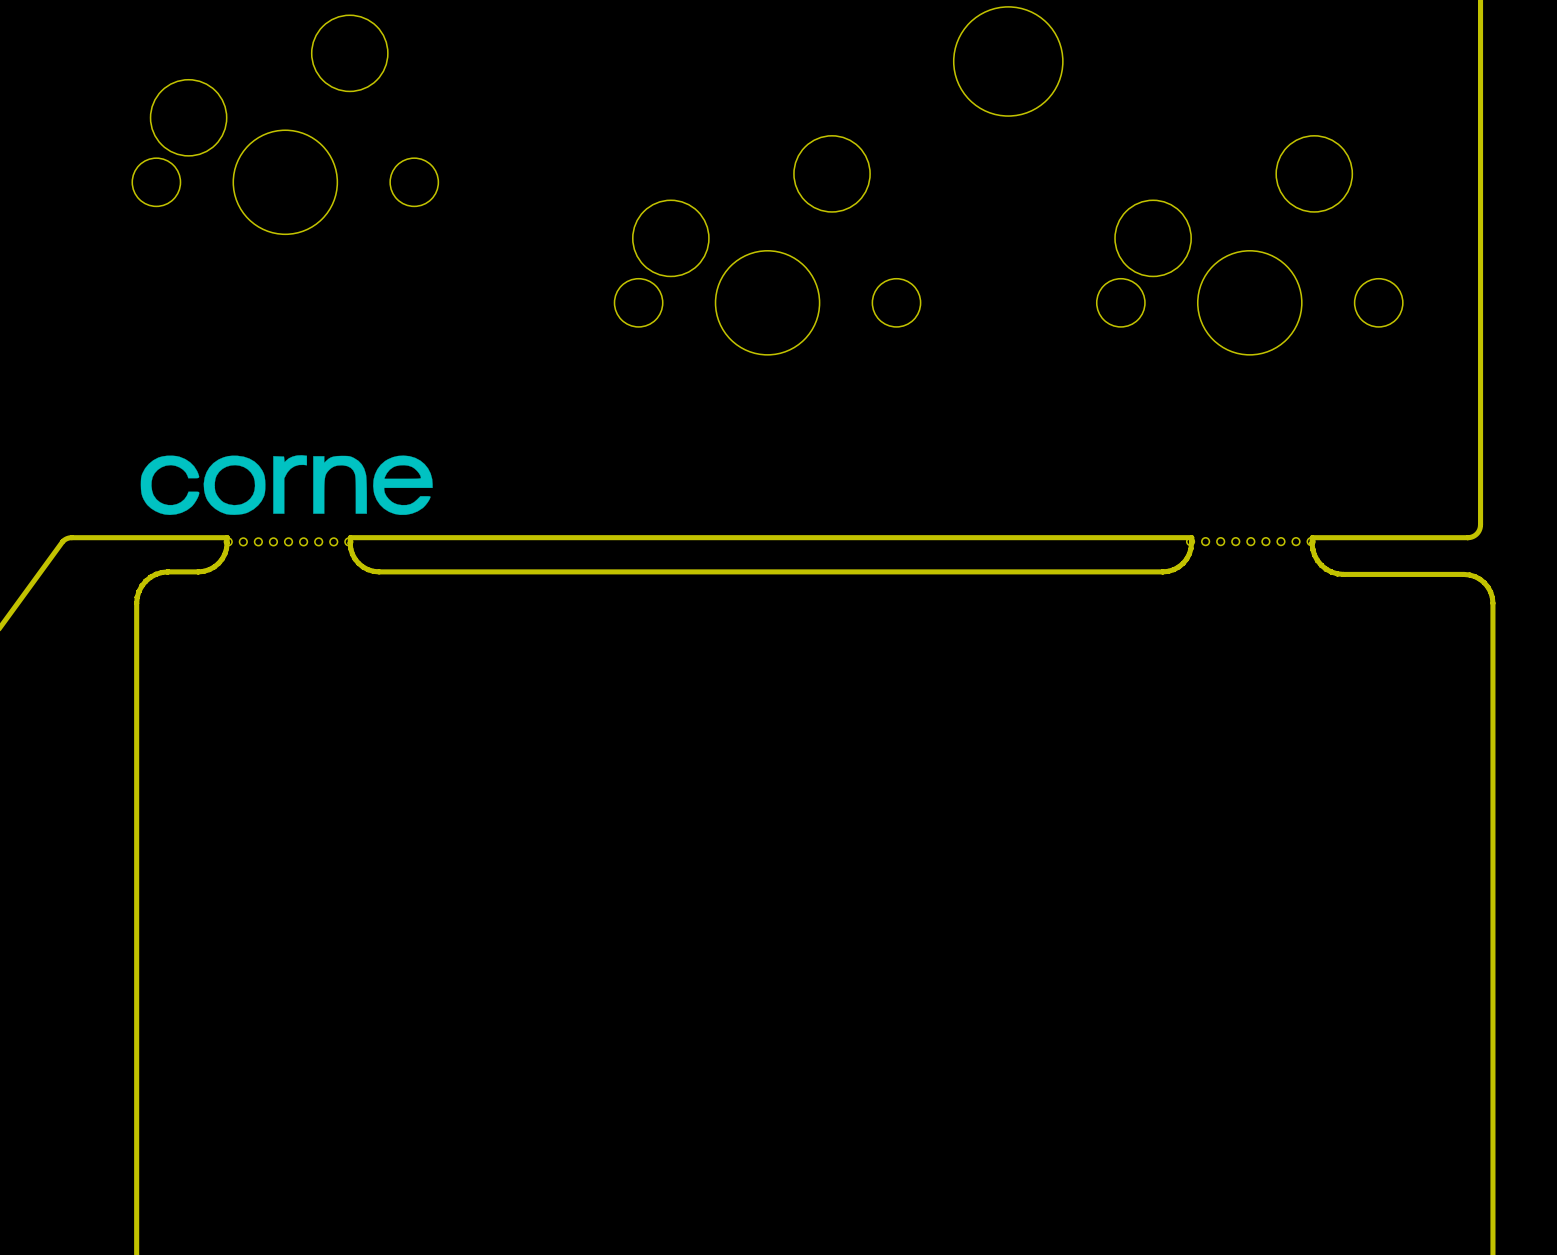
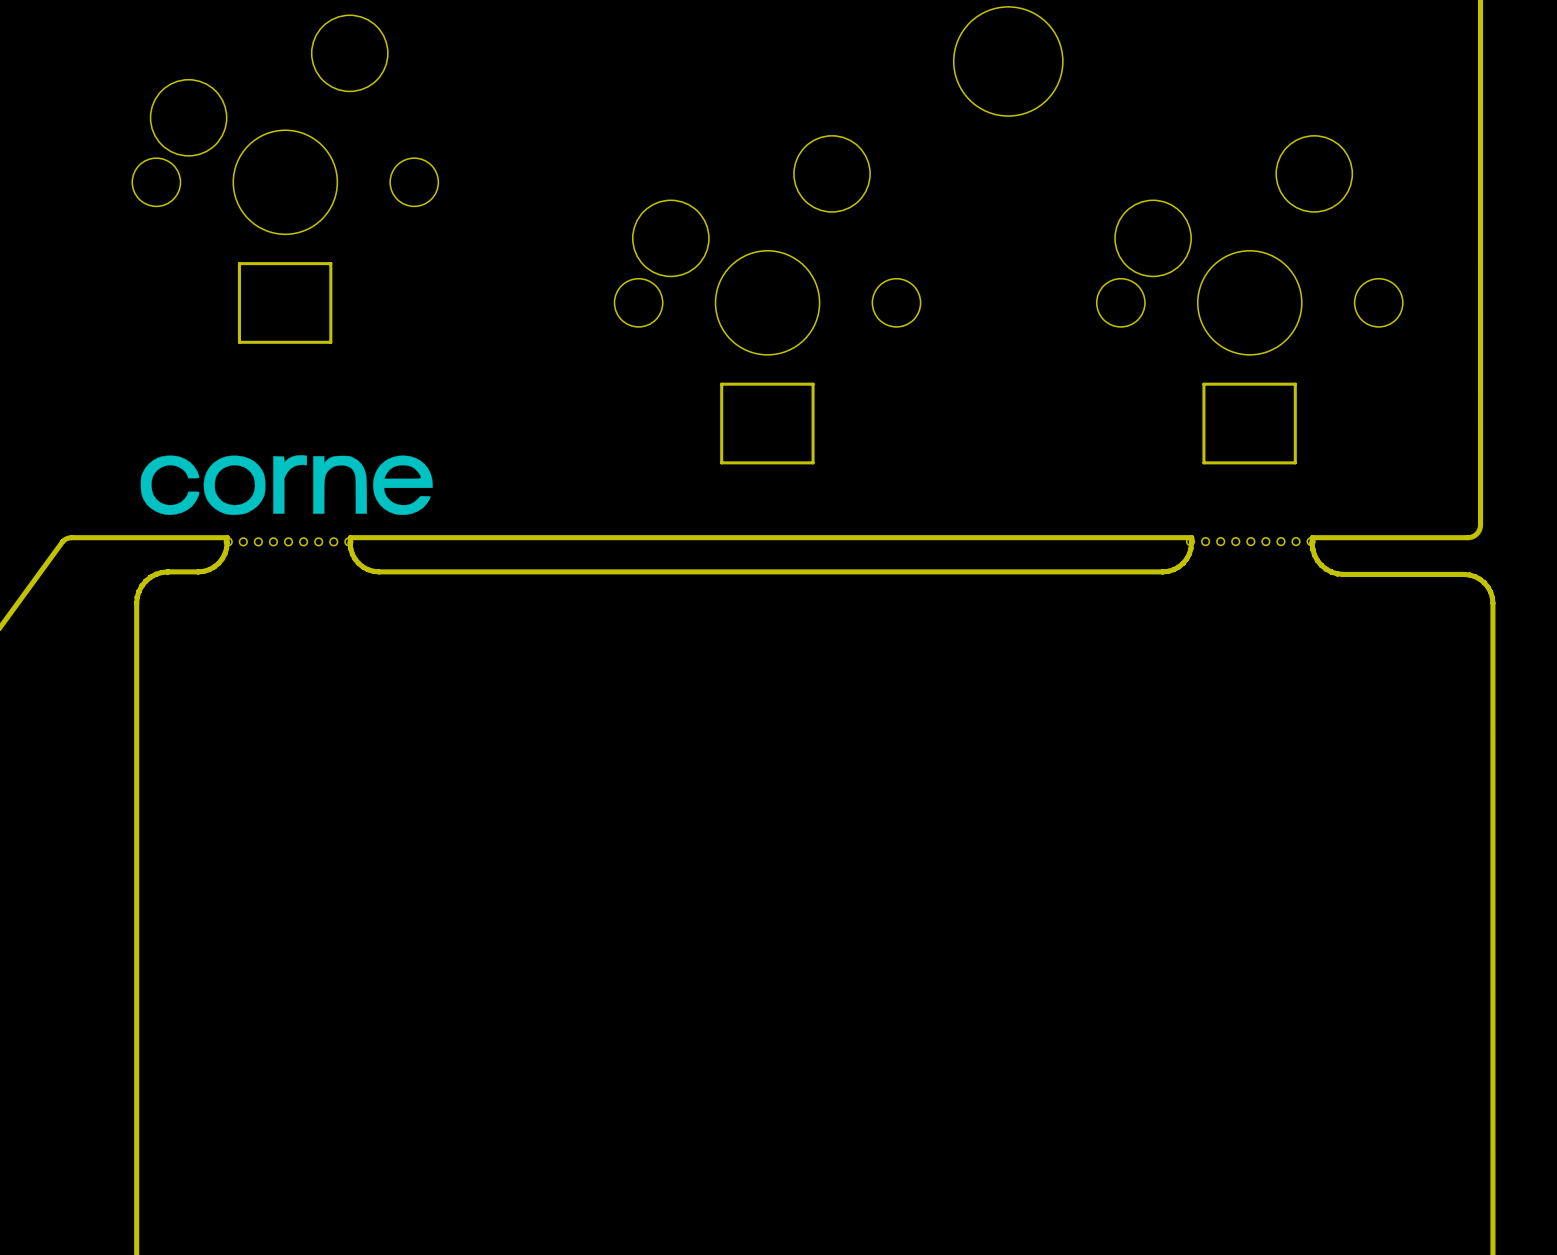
part: none -> (285, 302)
part: none -> (767, 423)
part: none -> (1249, 423)

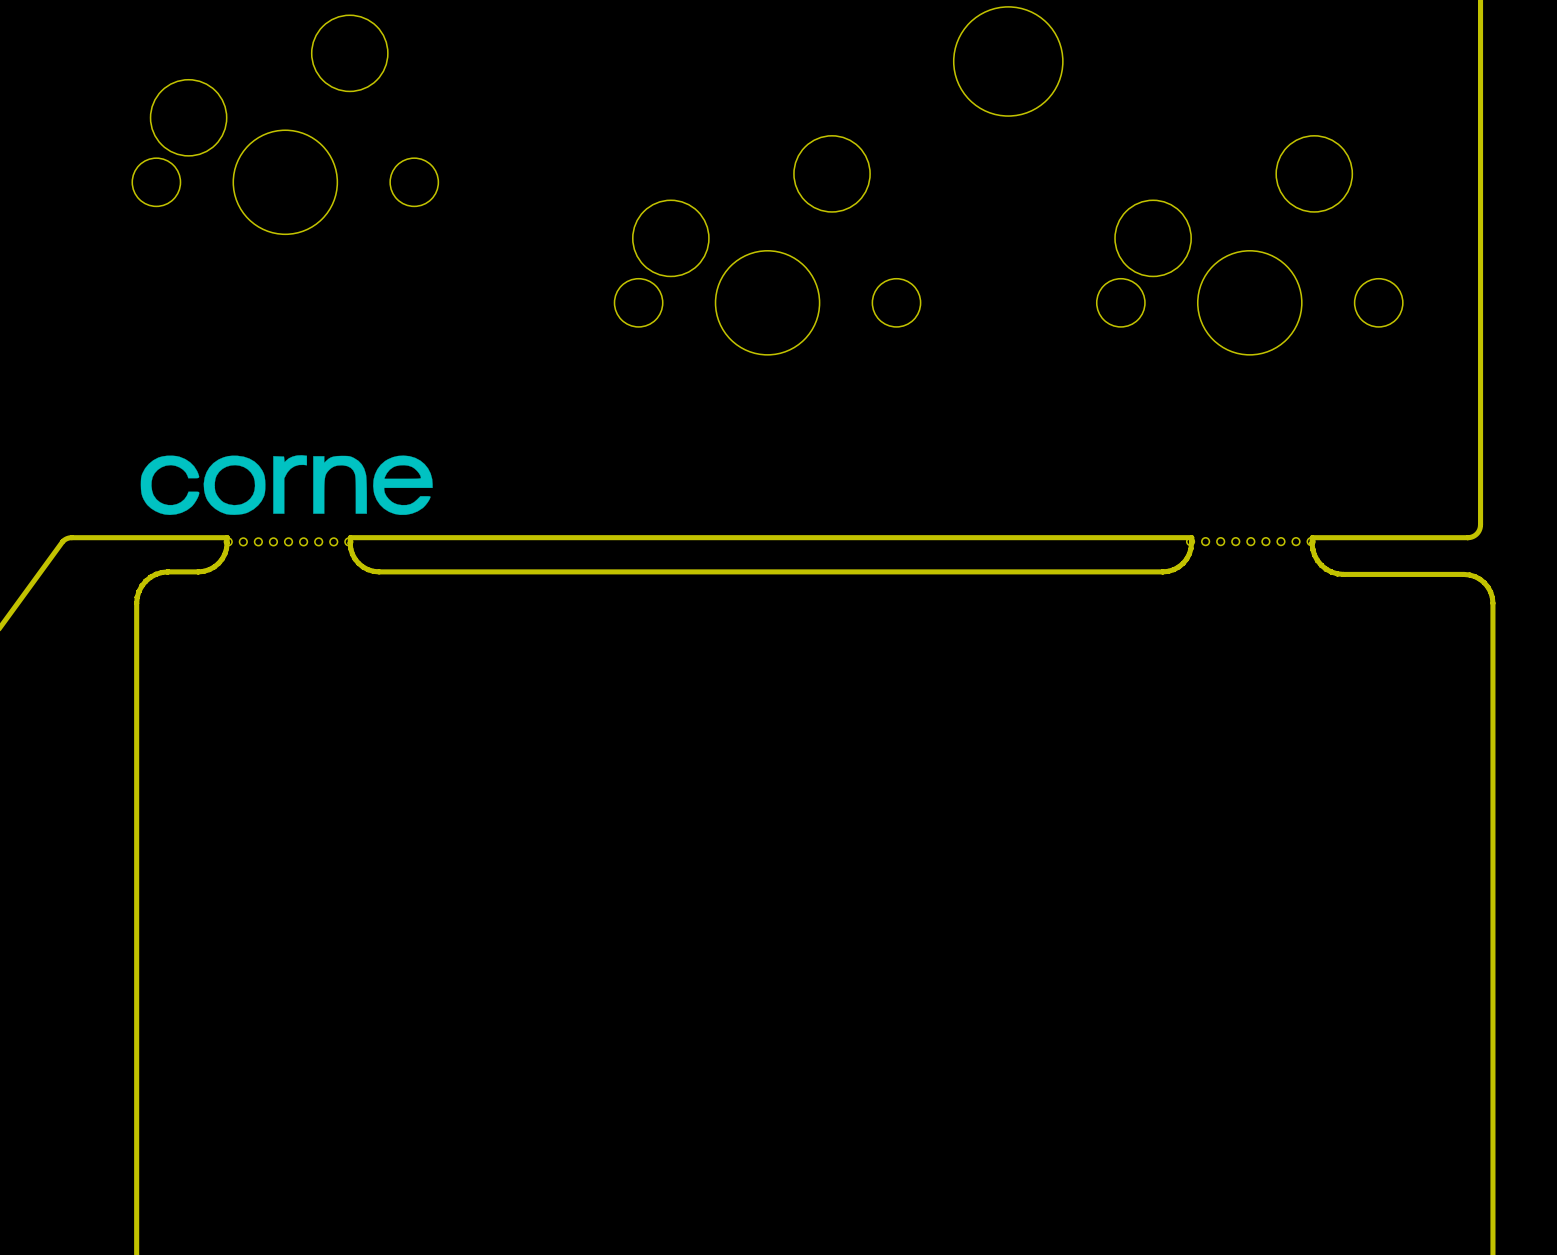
part: (285, 302) -> none
part: (767, 423) -> none
part: (1249, 423) -> none

